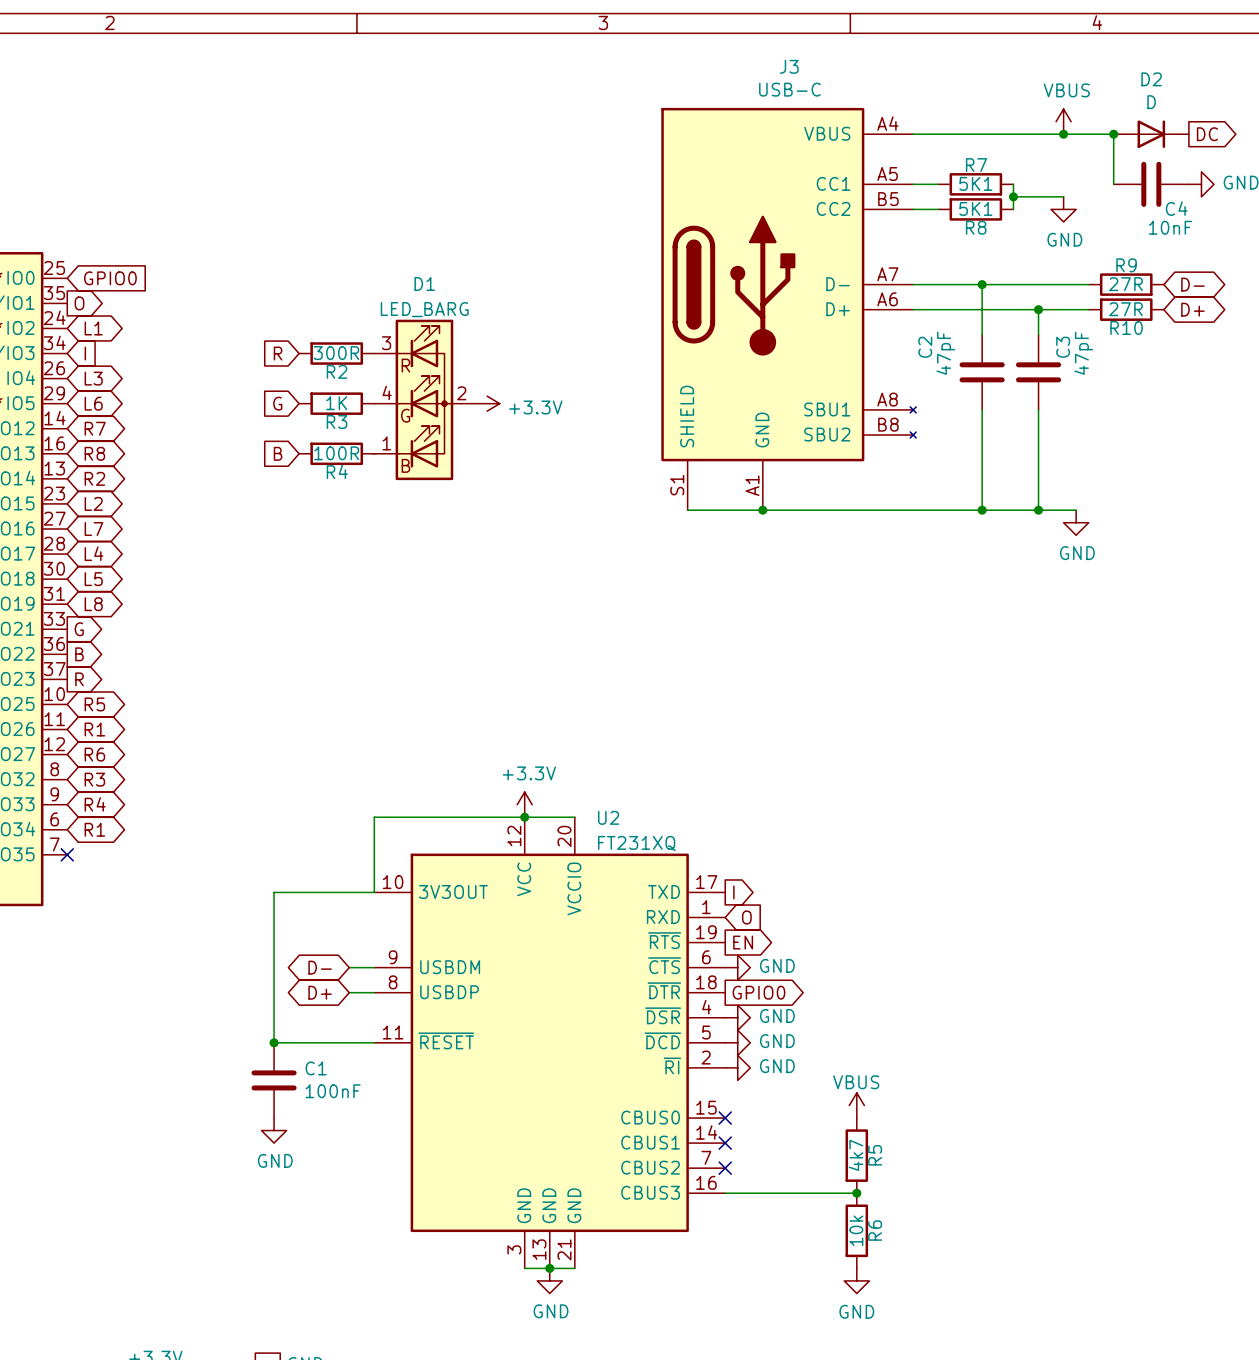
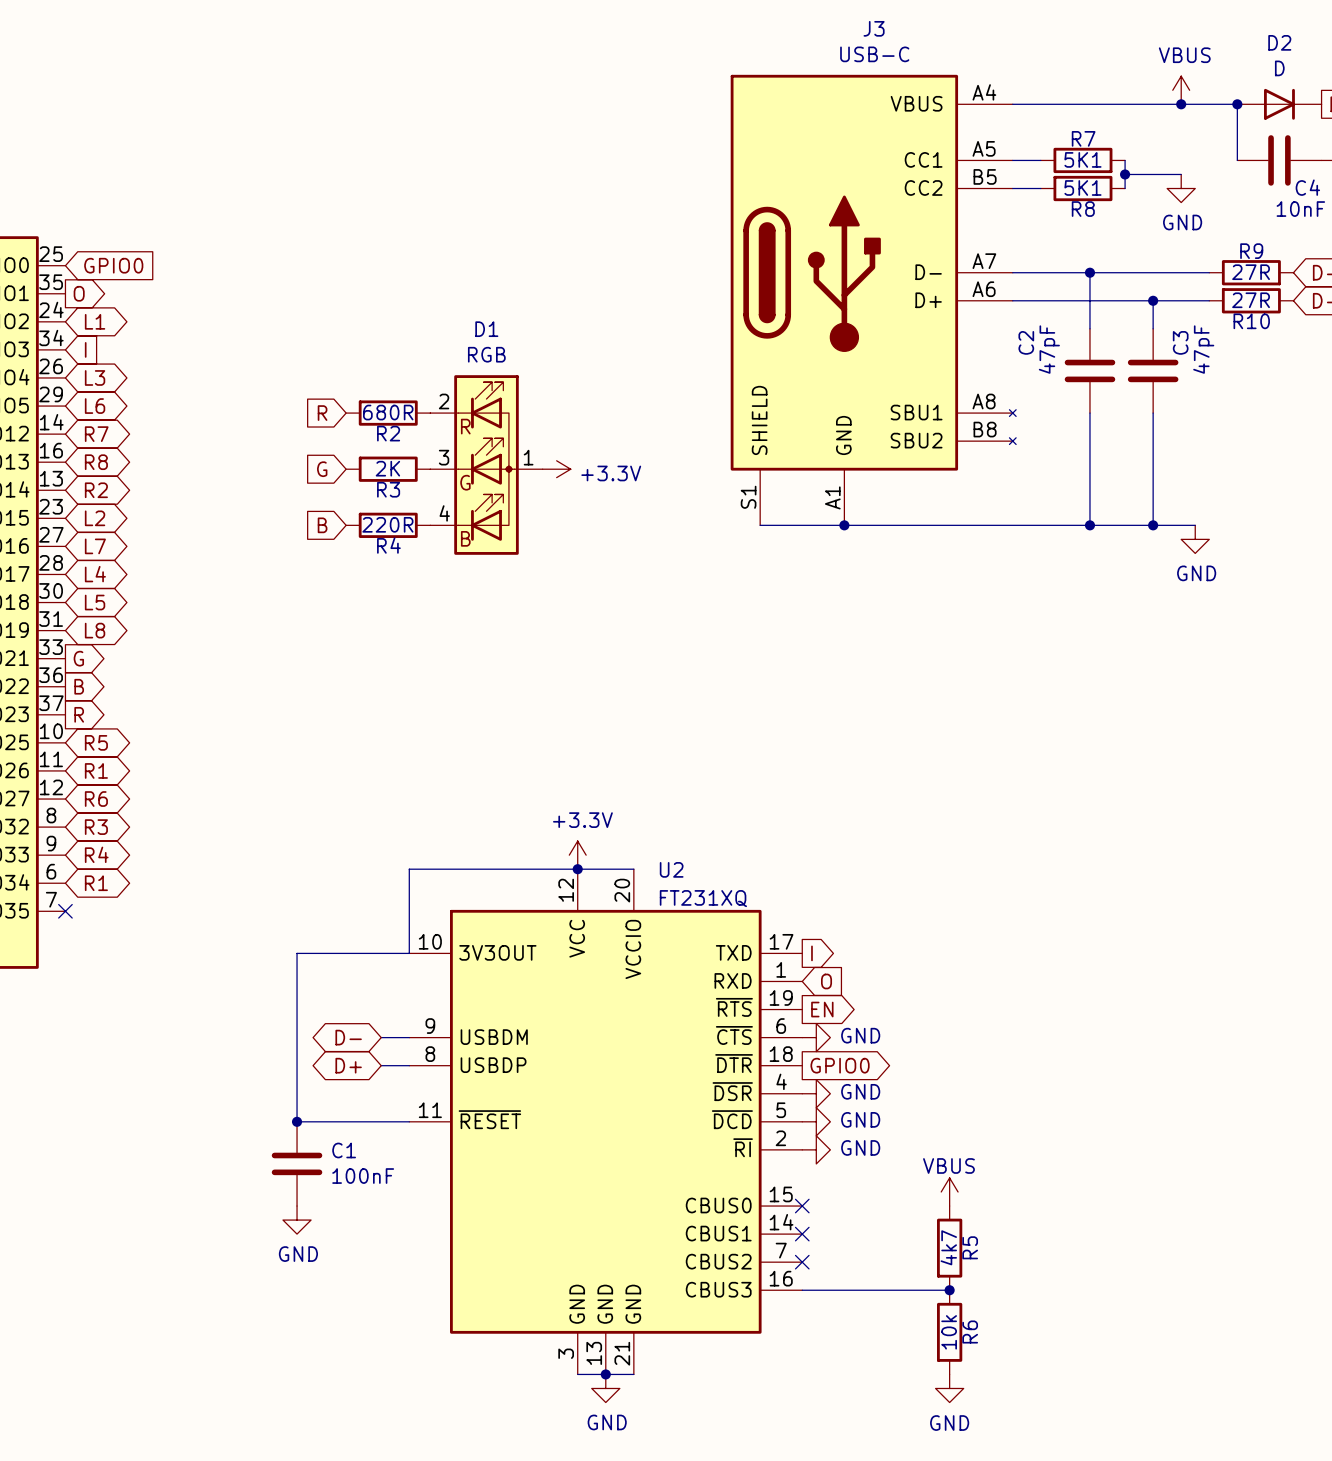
D1 name position: D1 (424, 283) -> D1 (486, 329)
D1 value: LED_BARG (424, 309) -> RGB (486, 354)
D1 pin number: 3 (386, 343) -> 2 (444, 401)
global label position: R (278, 353) -> R (322, 413)
R2 position: (336, 353) -> (388, 413)
R2 value: 300R (336, 353) -> 680R (388, 412)
D1 pin number: 4 (387, 393) -> 3 (444, 457)
D1 pin number: 2 (461, 393) -> 1 (528, 457)
D1 position: (424, 399) -> (486, 464)
global label position: G (277, 403) -> G (322, 469)
R3 position: (336, 403) -> (388, 469)
R3 value: 1K (336, 403) -> 2K (387, 468)
power symbol position: +3.3V (487, 403) -> +3.3V (556, 469)
D1 pin number: 1 (386, 443) -> 4 (444, 513)
global label position: B (278, 453) -> B (322, 525)
R4 position: (336, 453) -> (388, 525)
R4 value: 100R (336, 453) -> 220R (387, 524)

